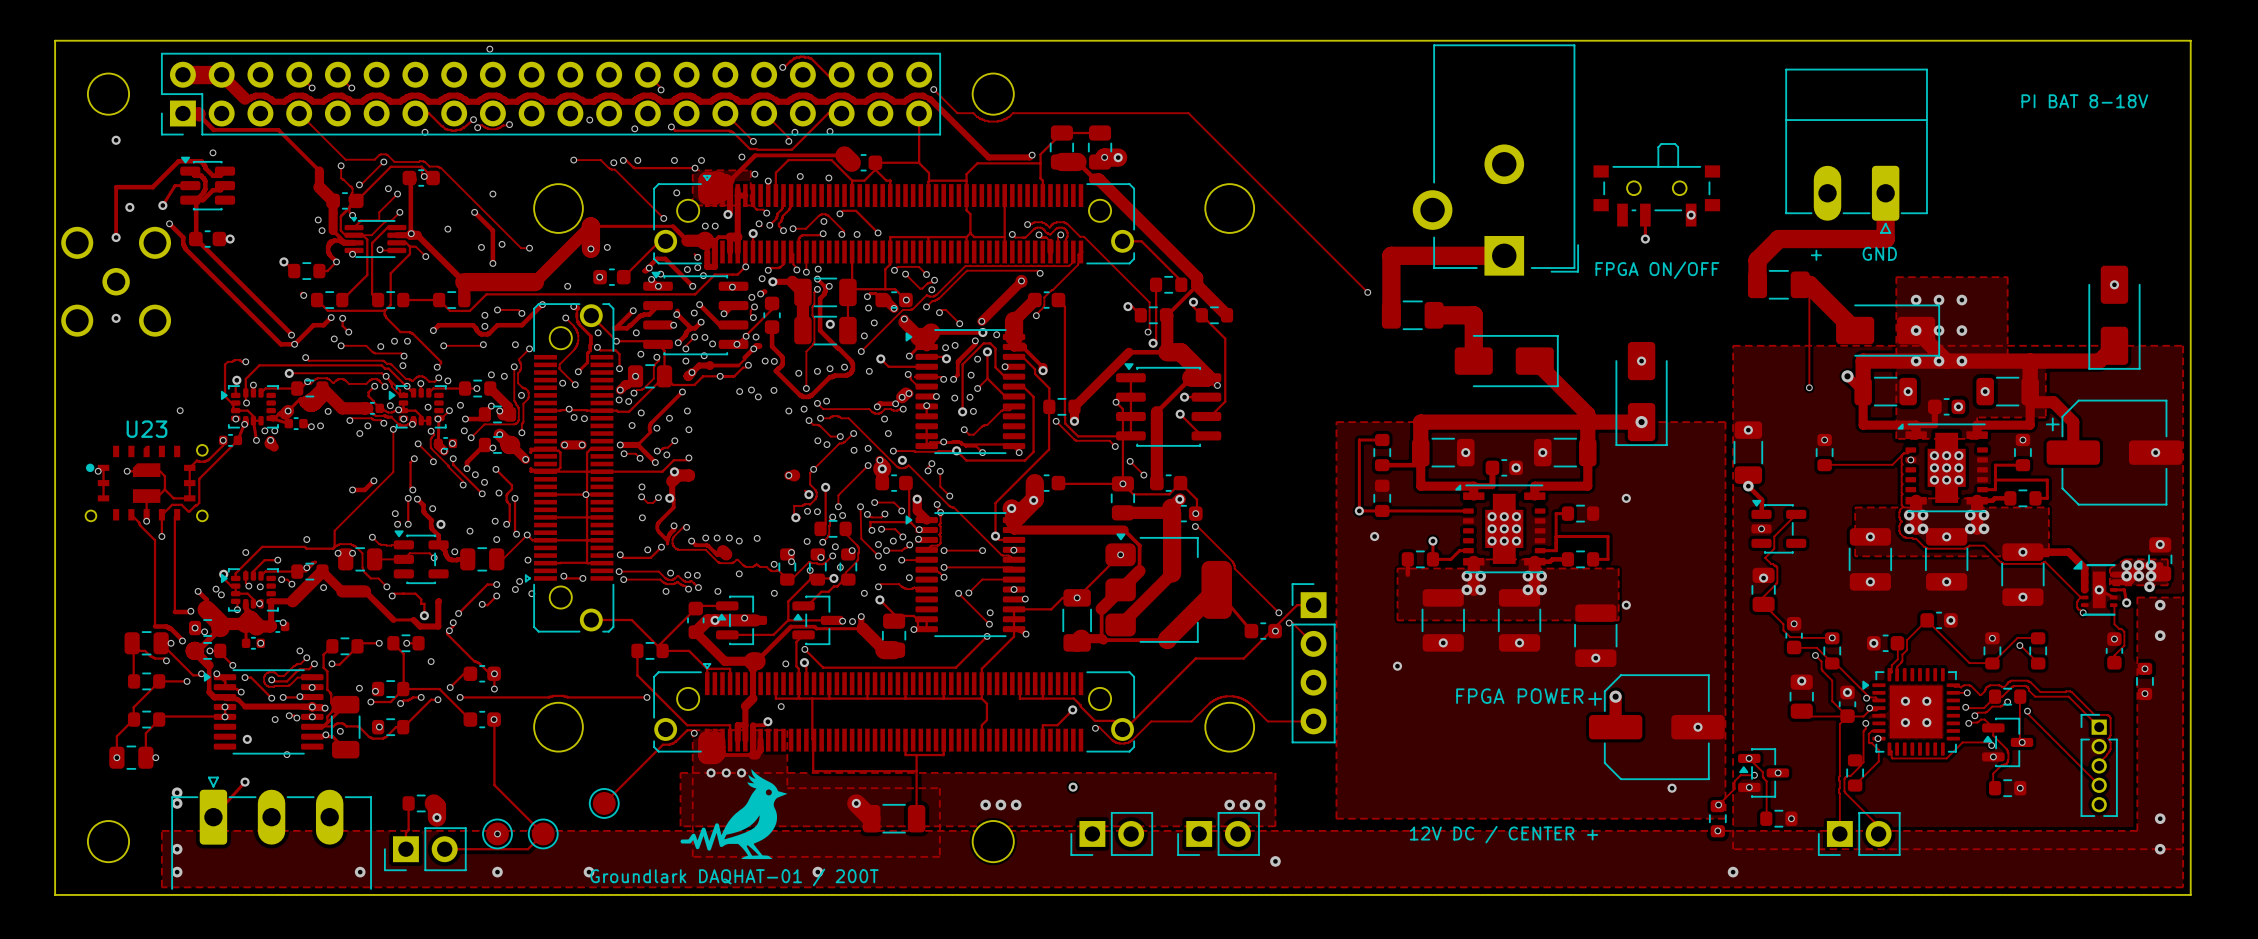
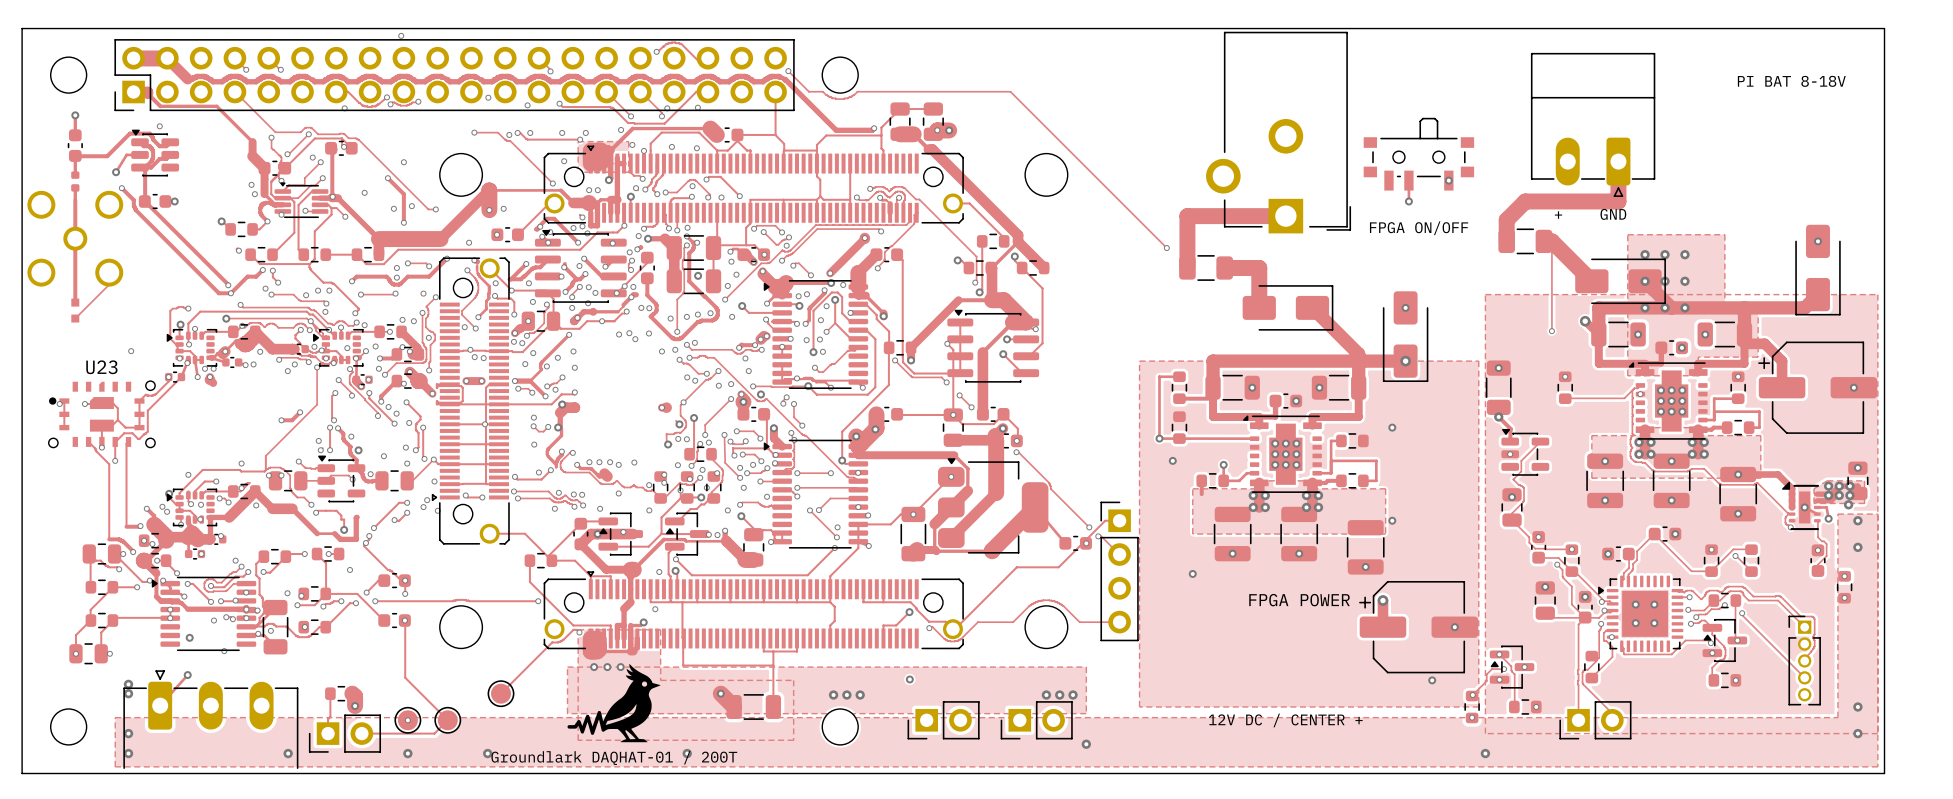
track: none -> (75, 115) (75, 135)
part: none -> (75, 145)
via: (129, 207) -> none
track: (116, 208) (116, 223) -> none
part: none -> (75, 181)
track: none -> (75, 200) (75, 302)
via: (116, 237) -> none
via: (116, 318) -> none
track: none -> (109, 284) (75, 318)
part: none -> (75, 310)

